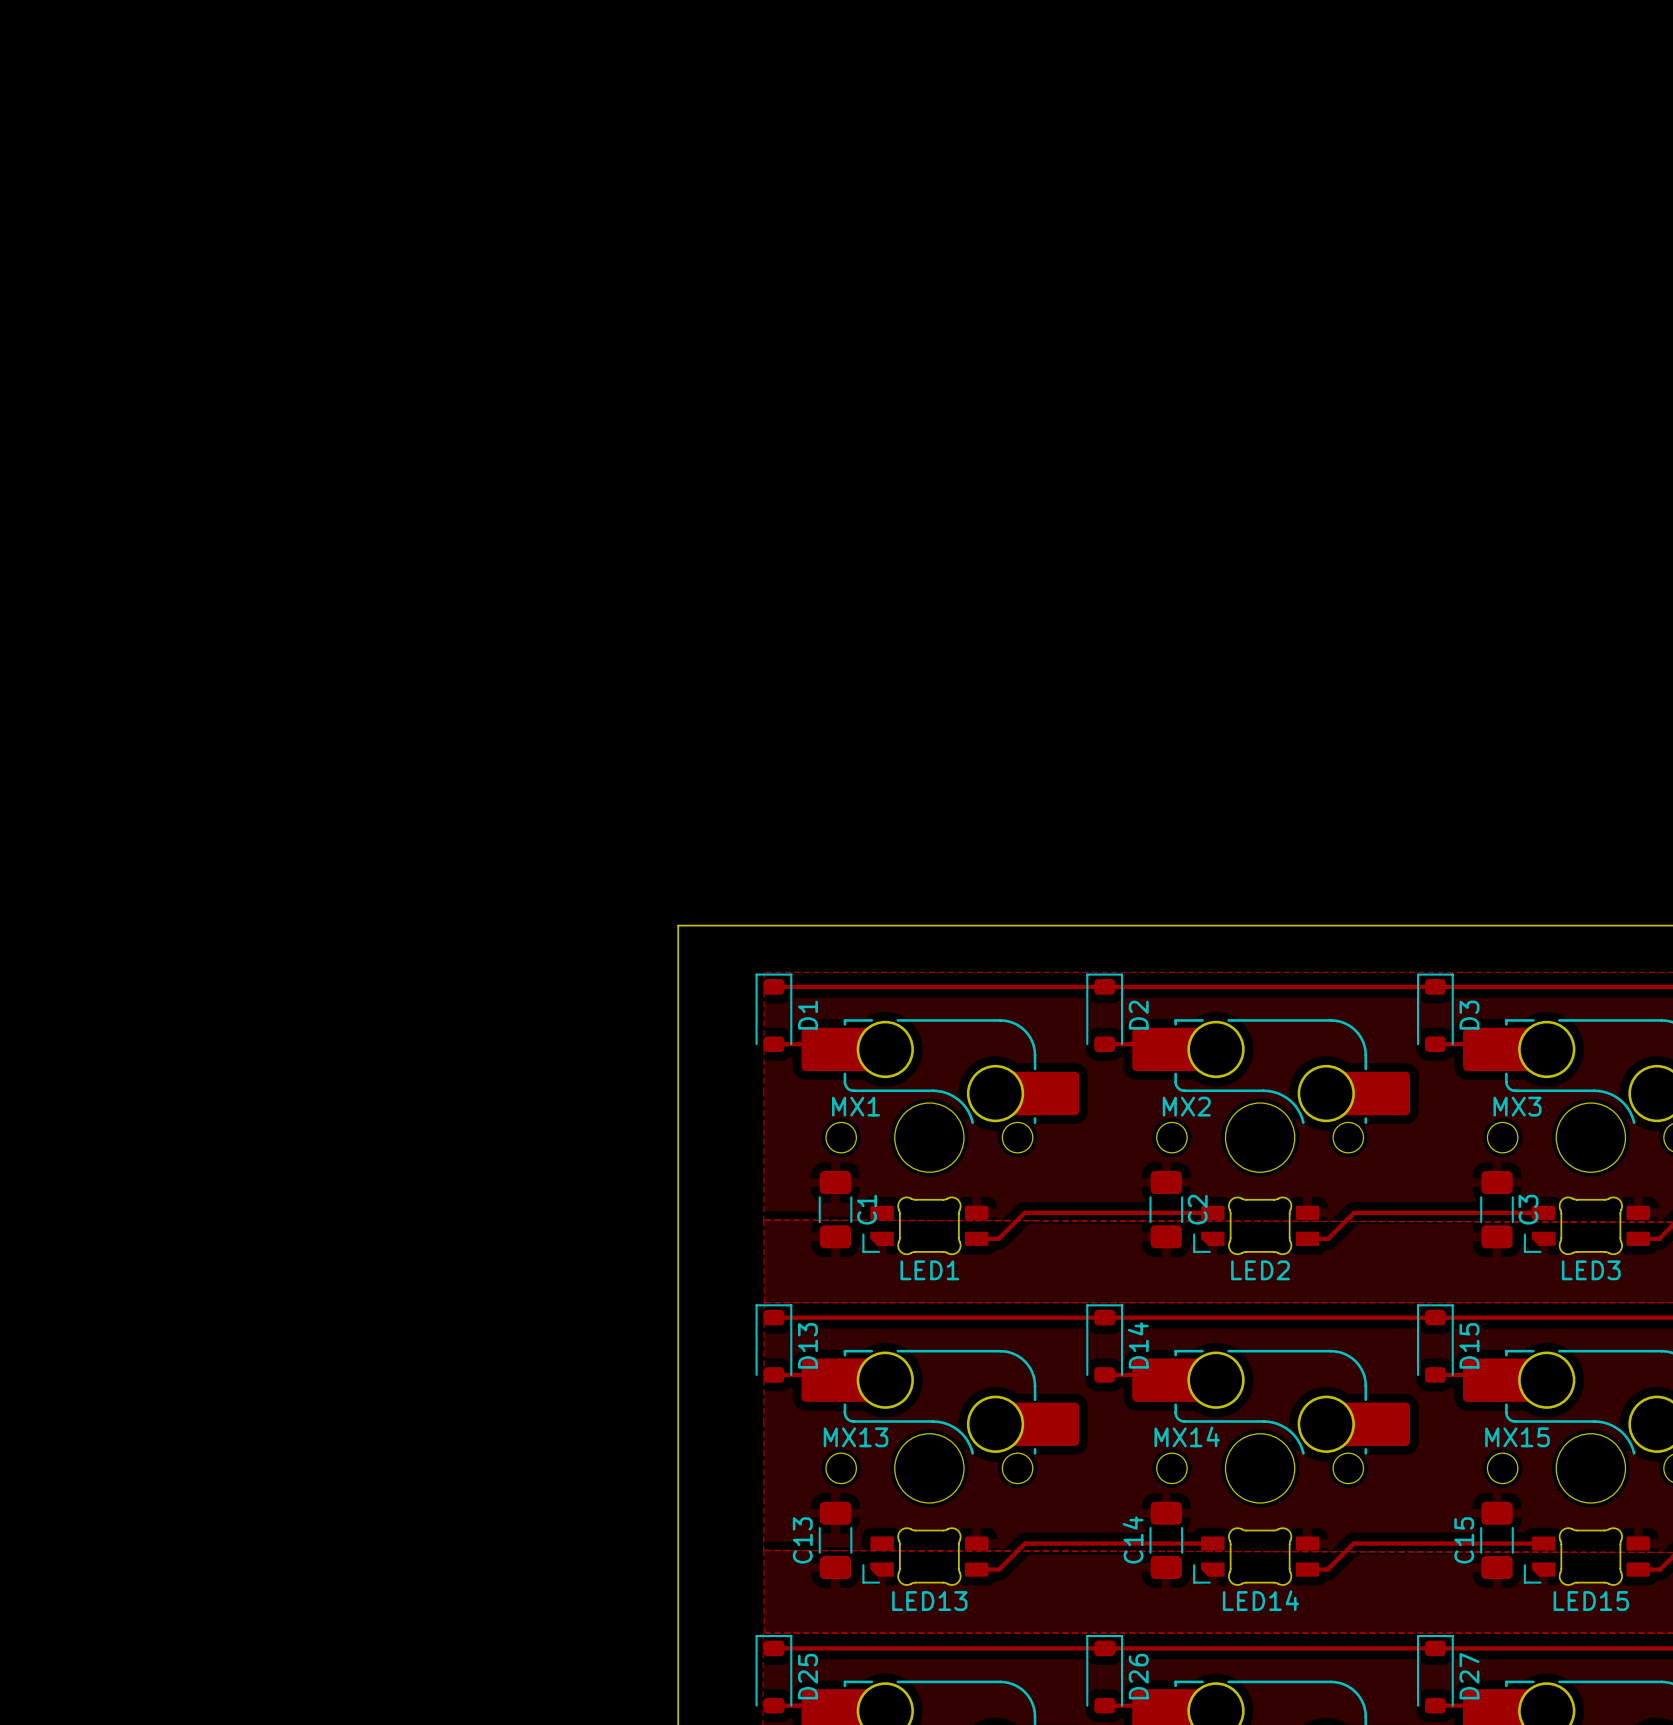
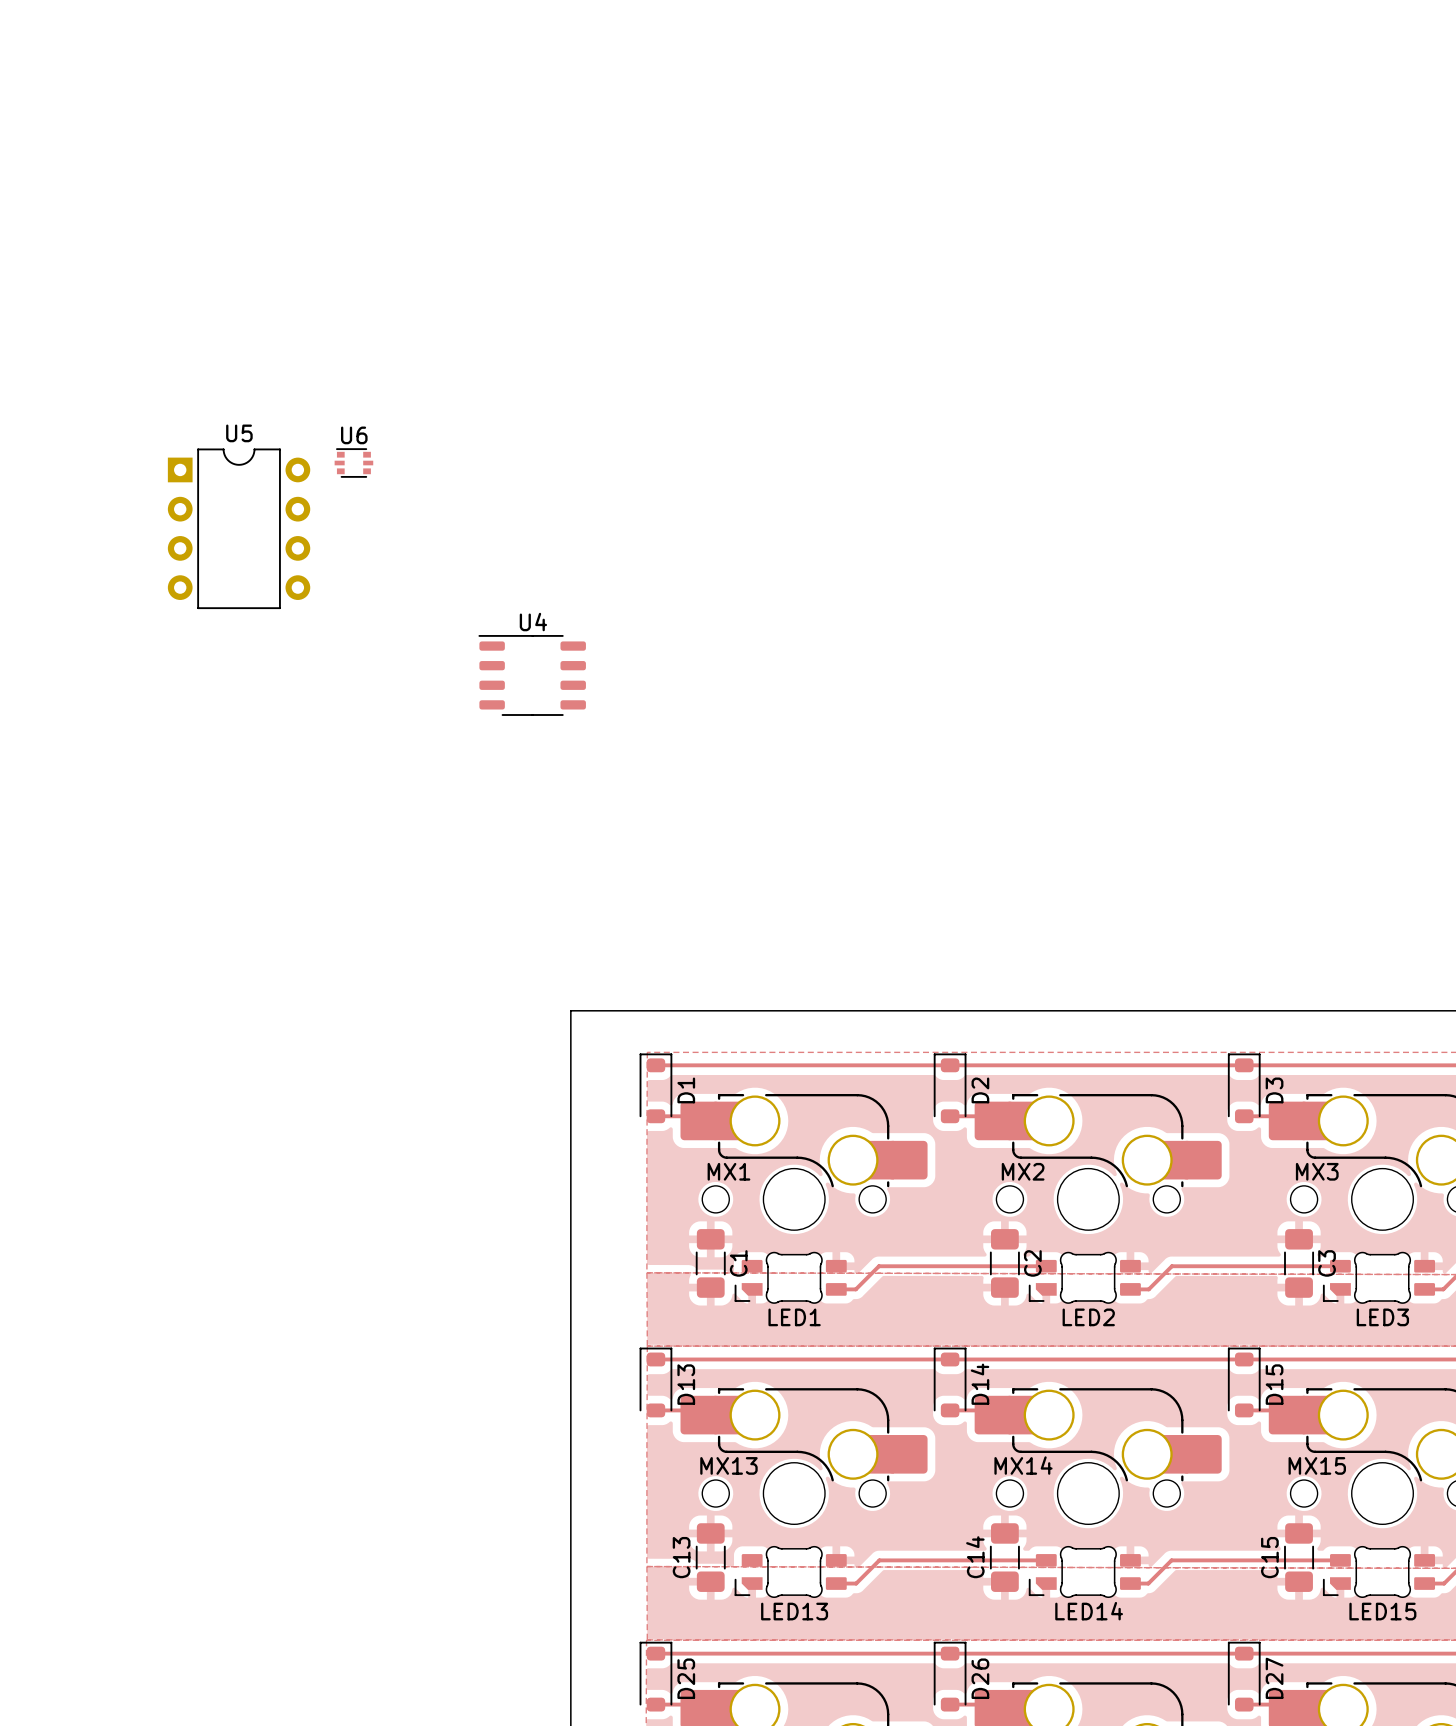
U6: none -> (353, 463)
U5: none -> (239, 528)
U4: none -> (532, 675)

